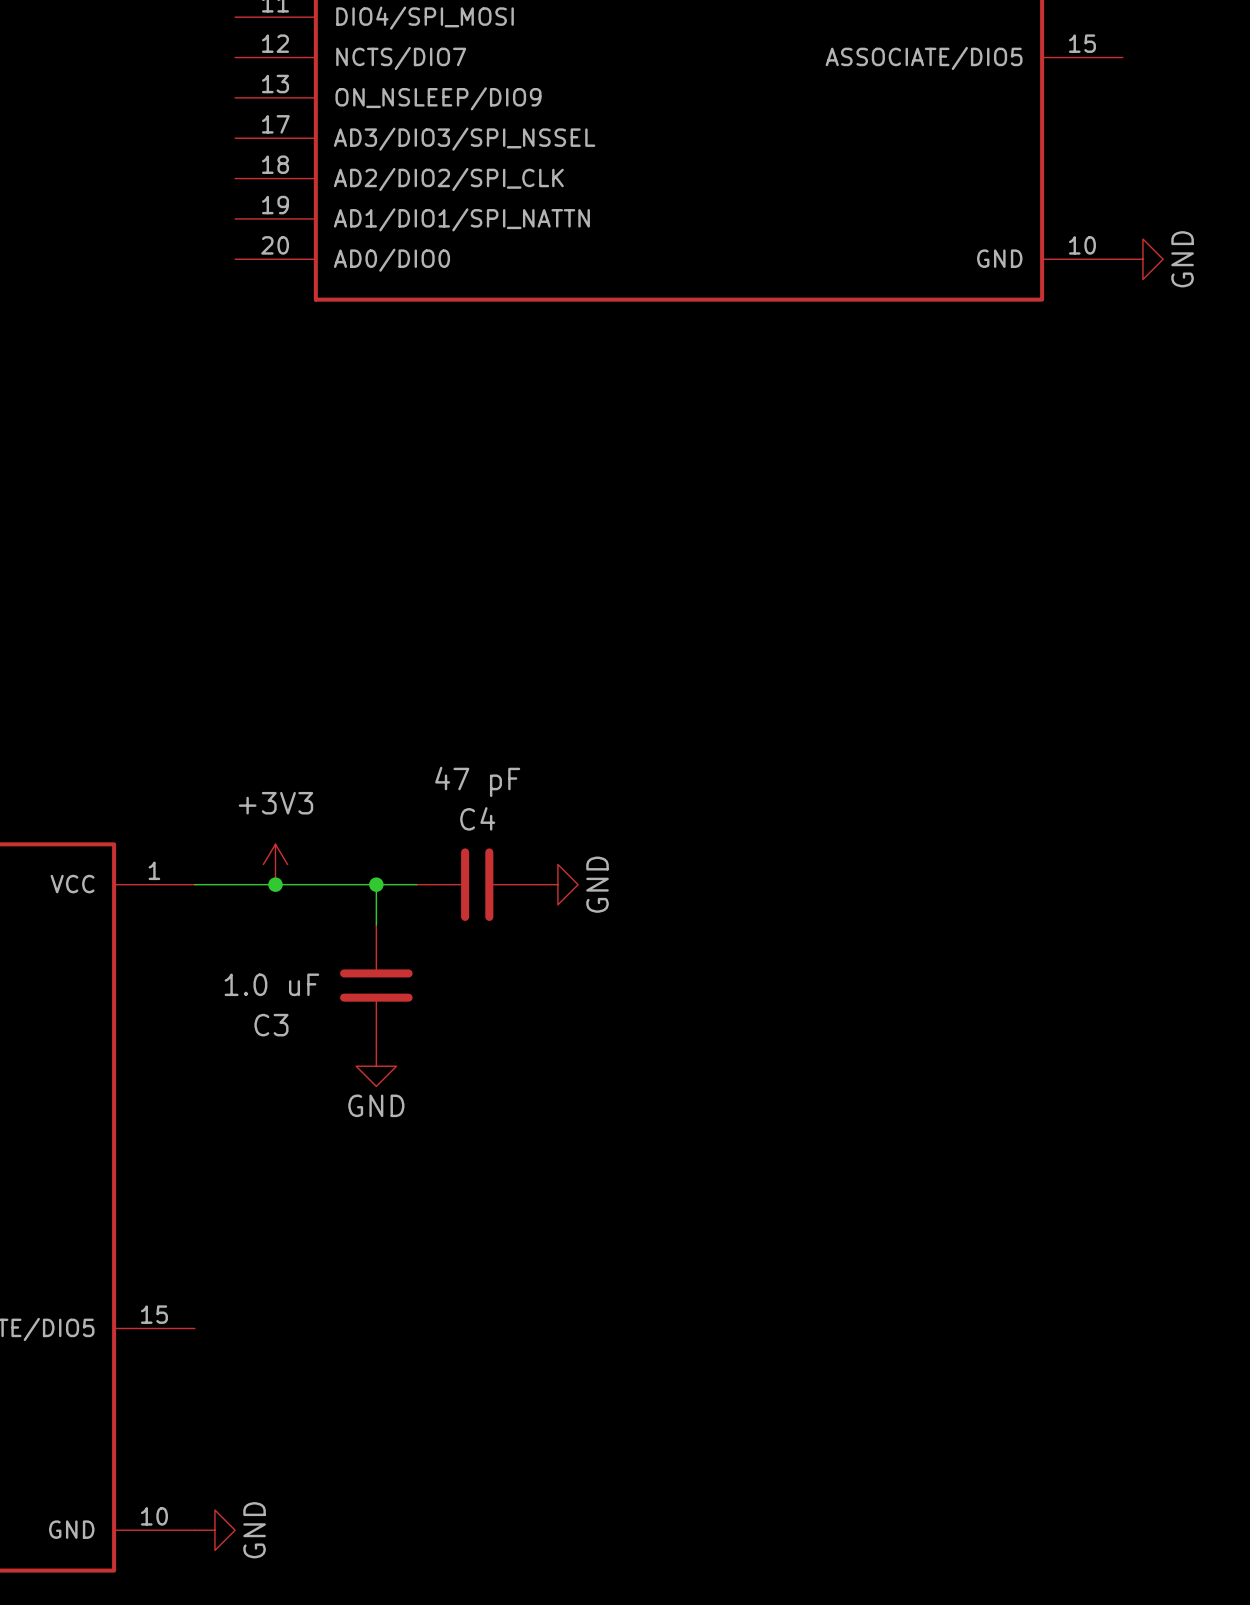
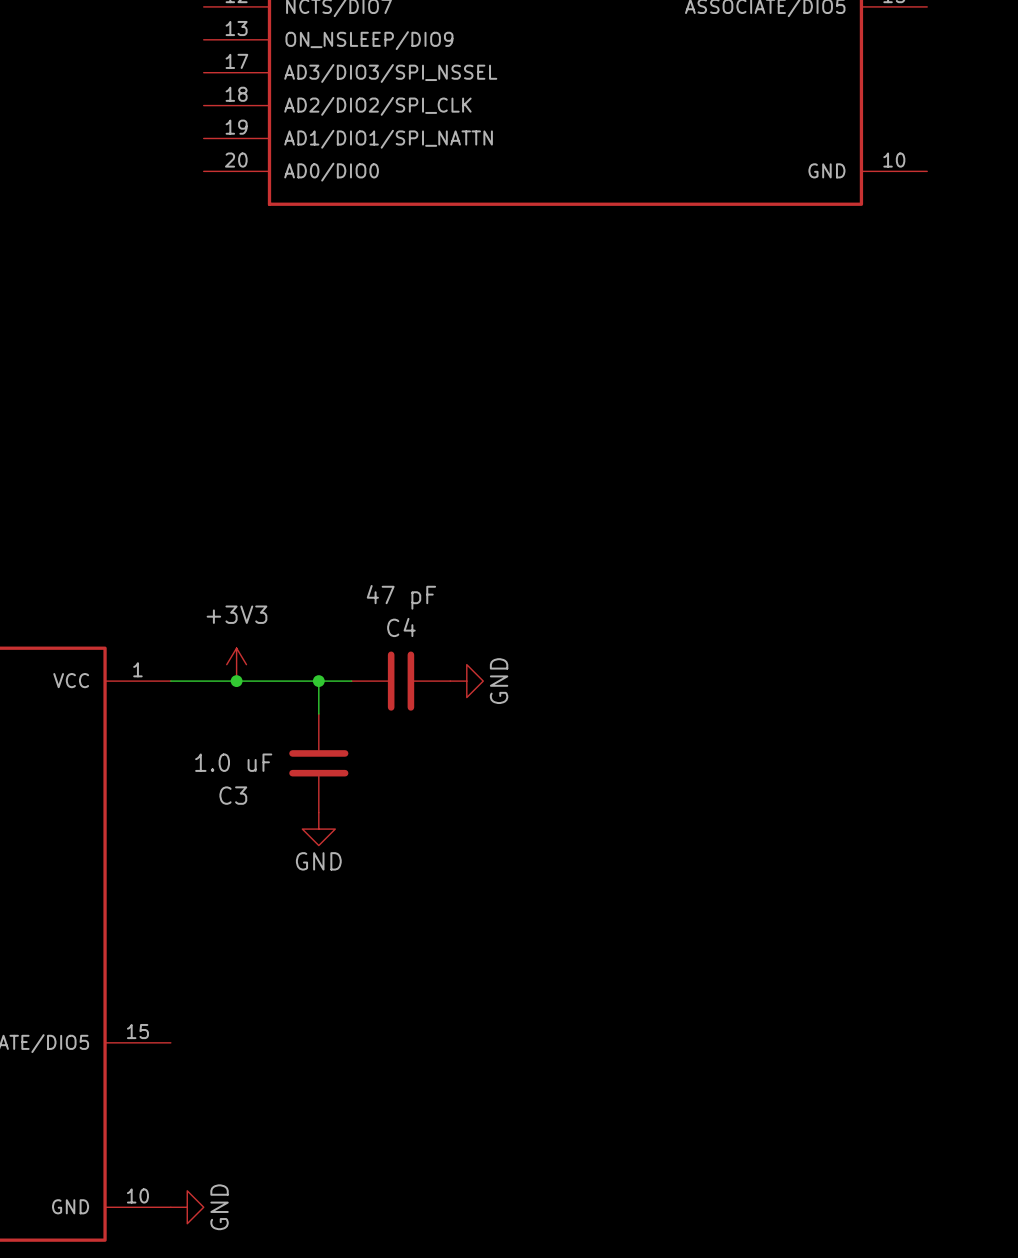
power symbol: GND (1142, 259) -> none

